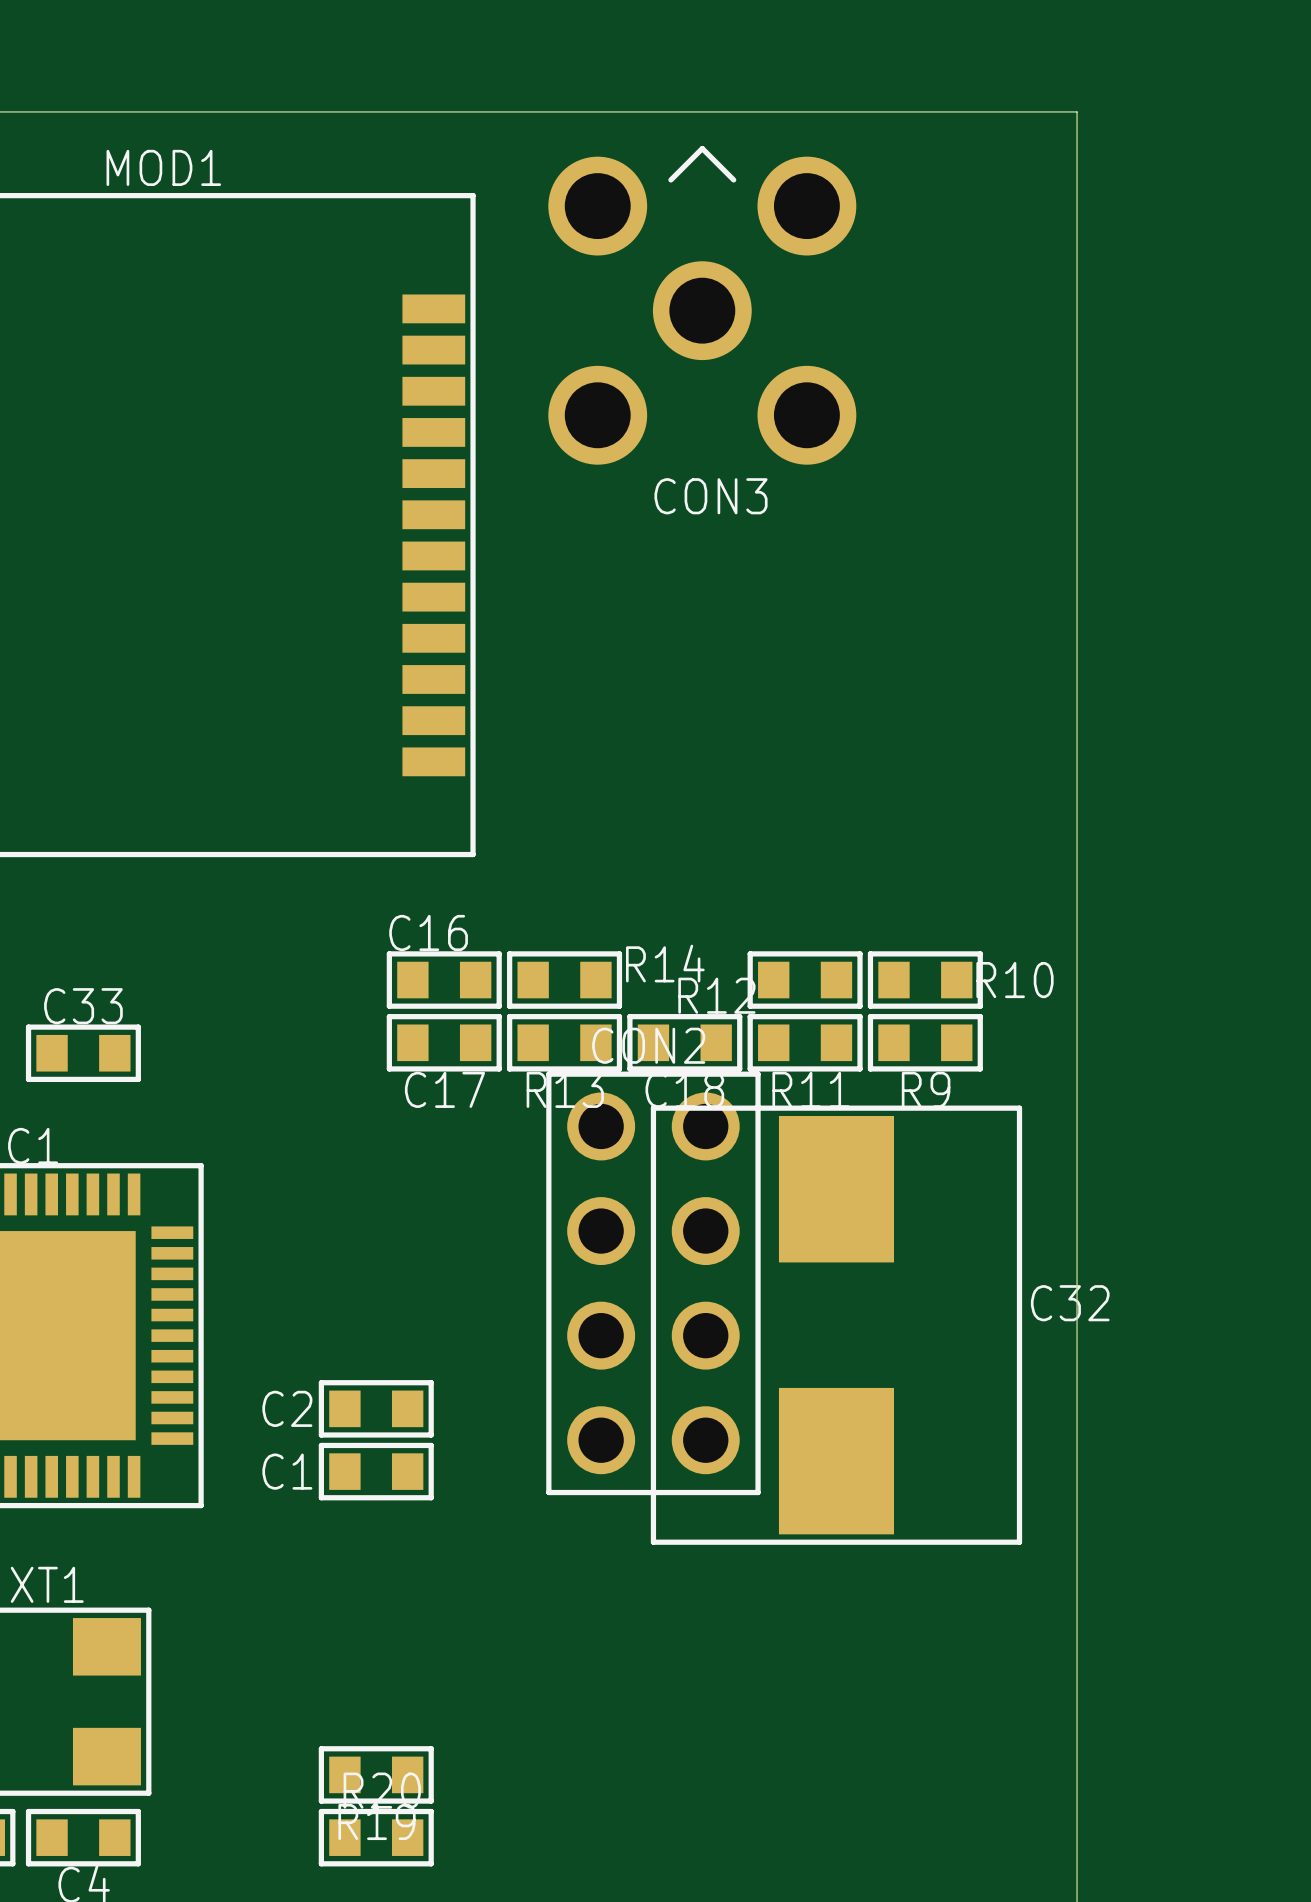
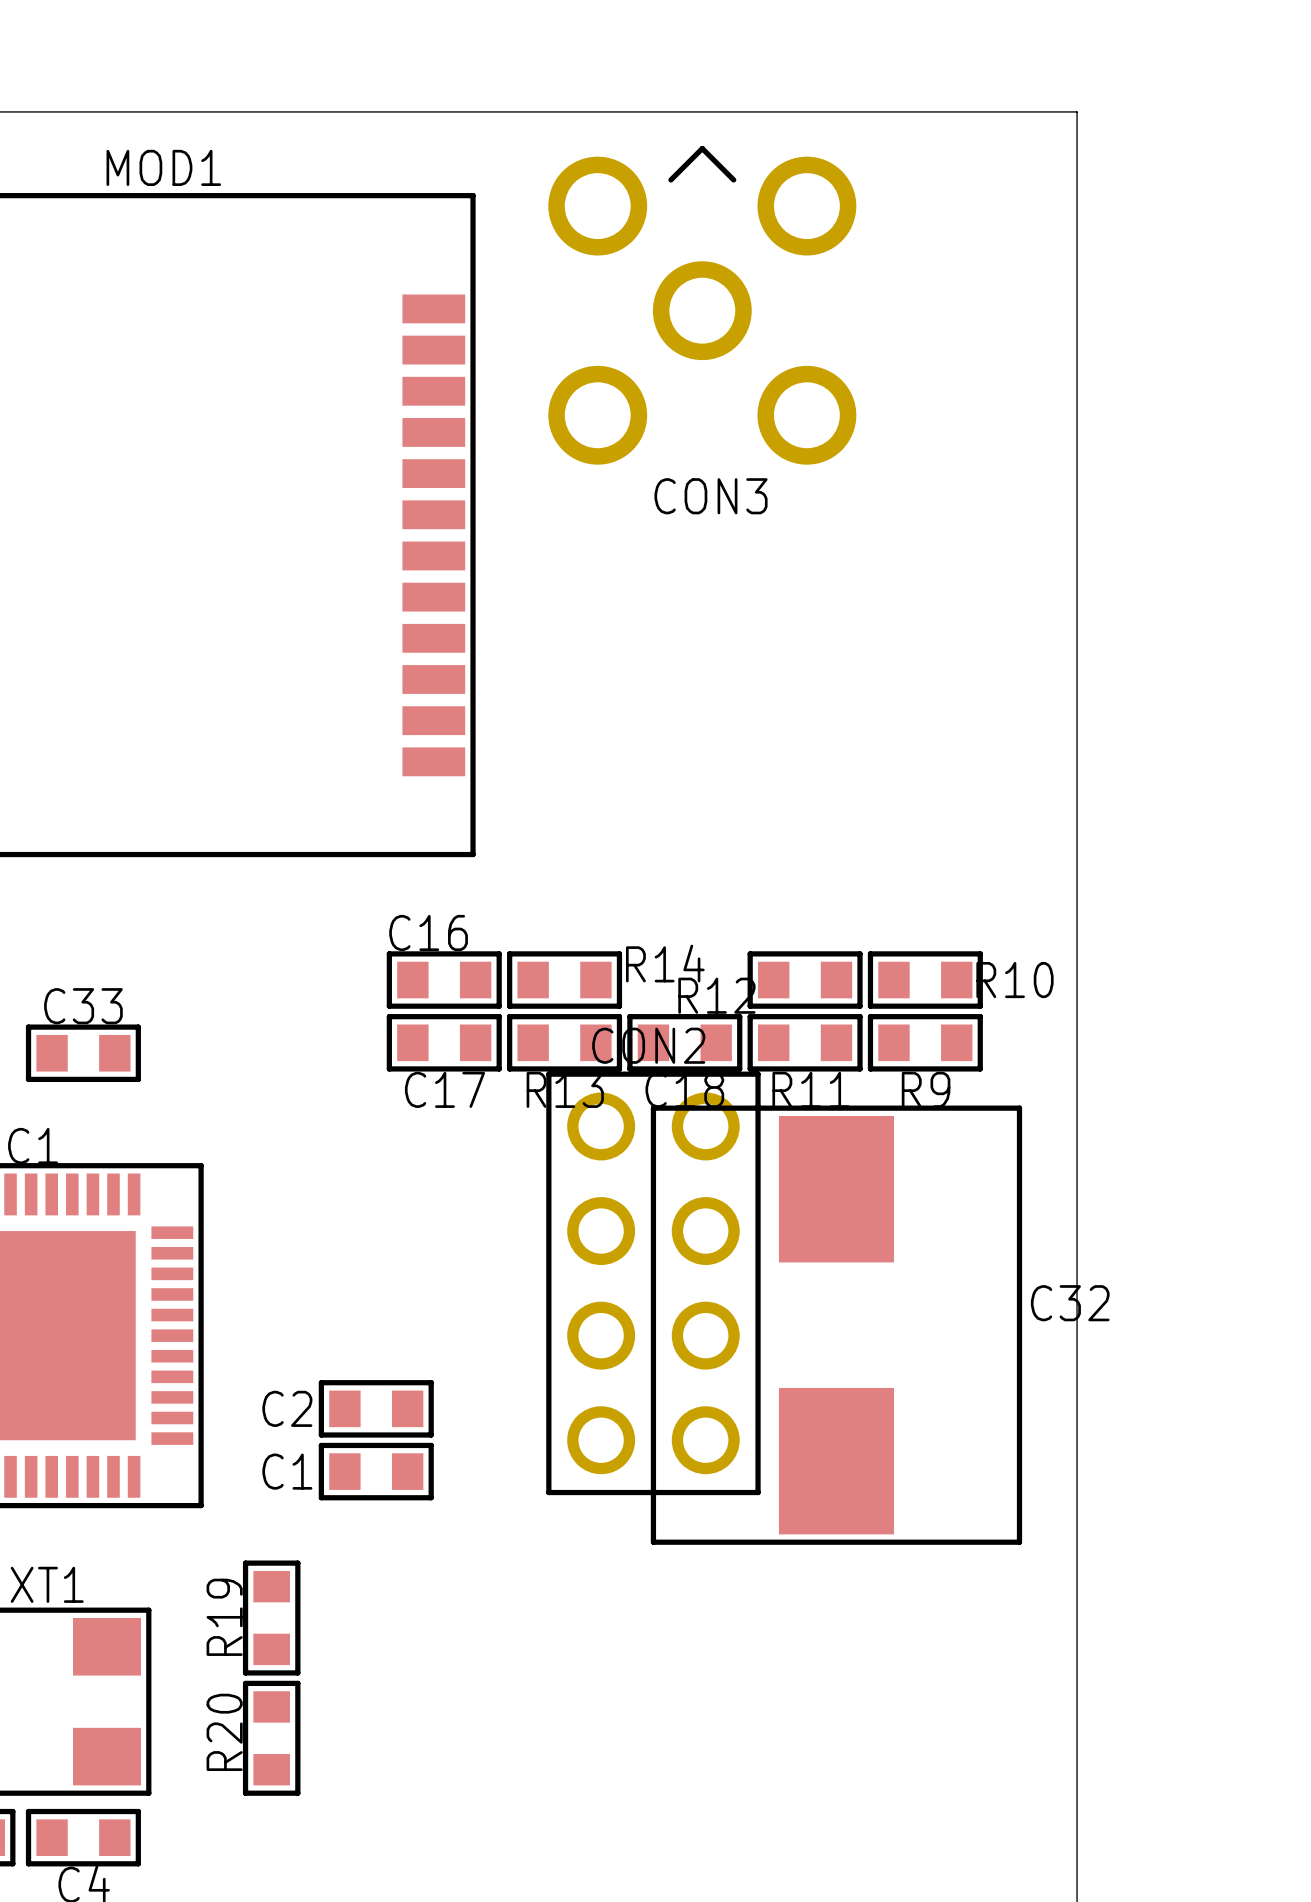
R19 rotation: 0° (376, 1774) -> 90° clockwise (271, 1618)
R19 position: (376, 1774) -> (271, 1618)
R20 rotation: 0° (376, 1837) -> 90° clockwise (271, 1738)
R20 position: (376, 1837) -> (271, 1738)

